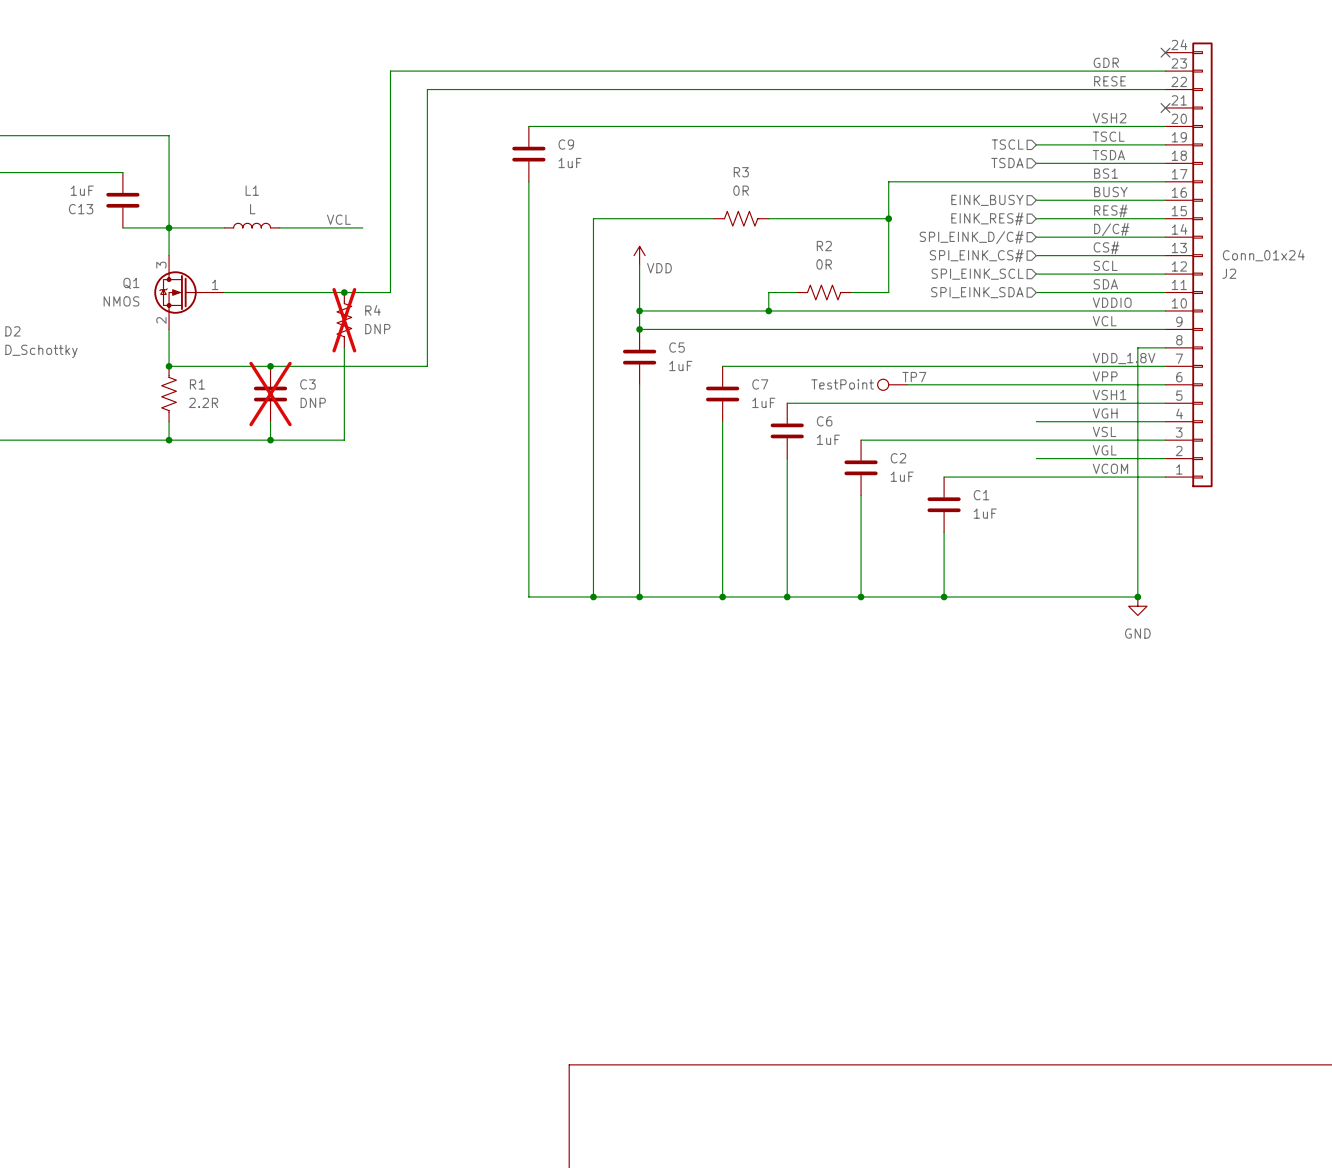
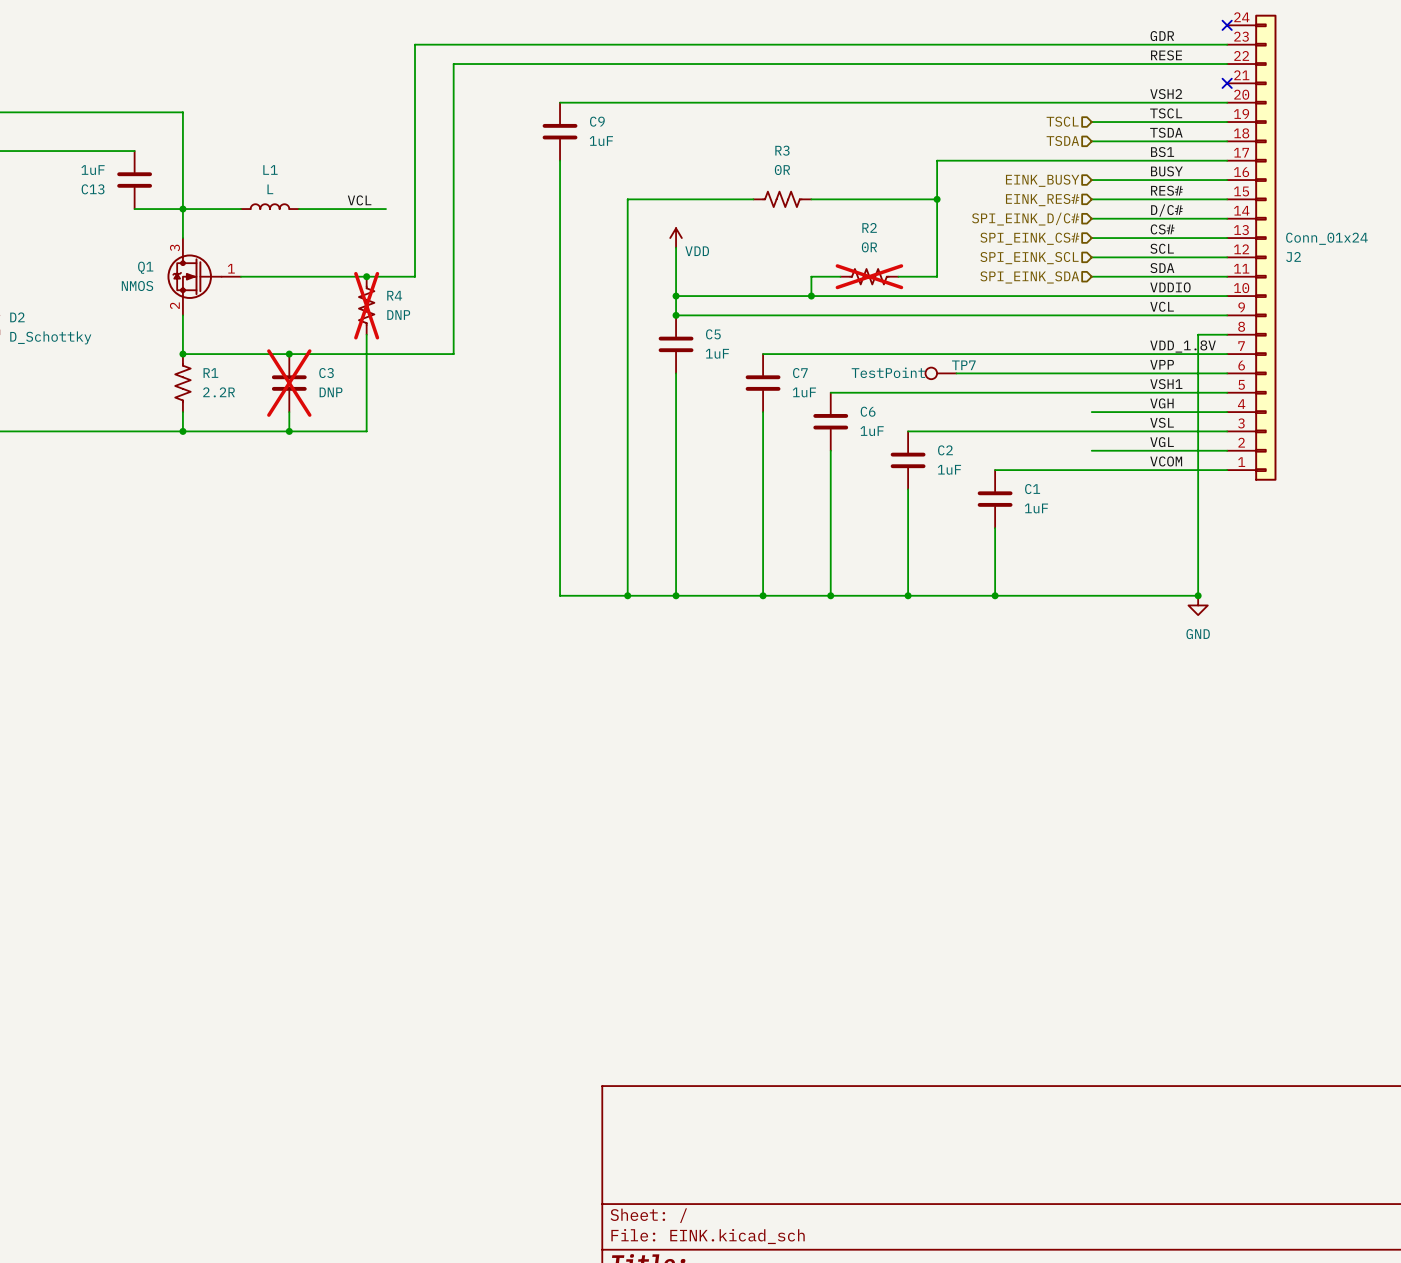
R2 do-not-place cross: none -> (869, 276)

